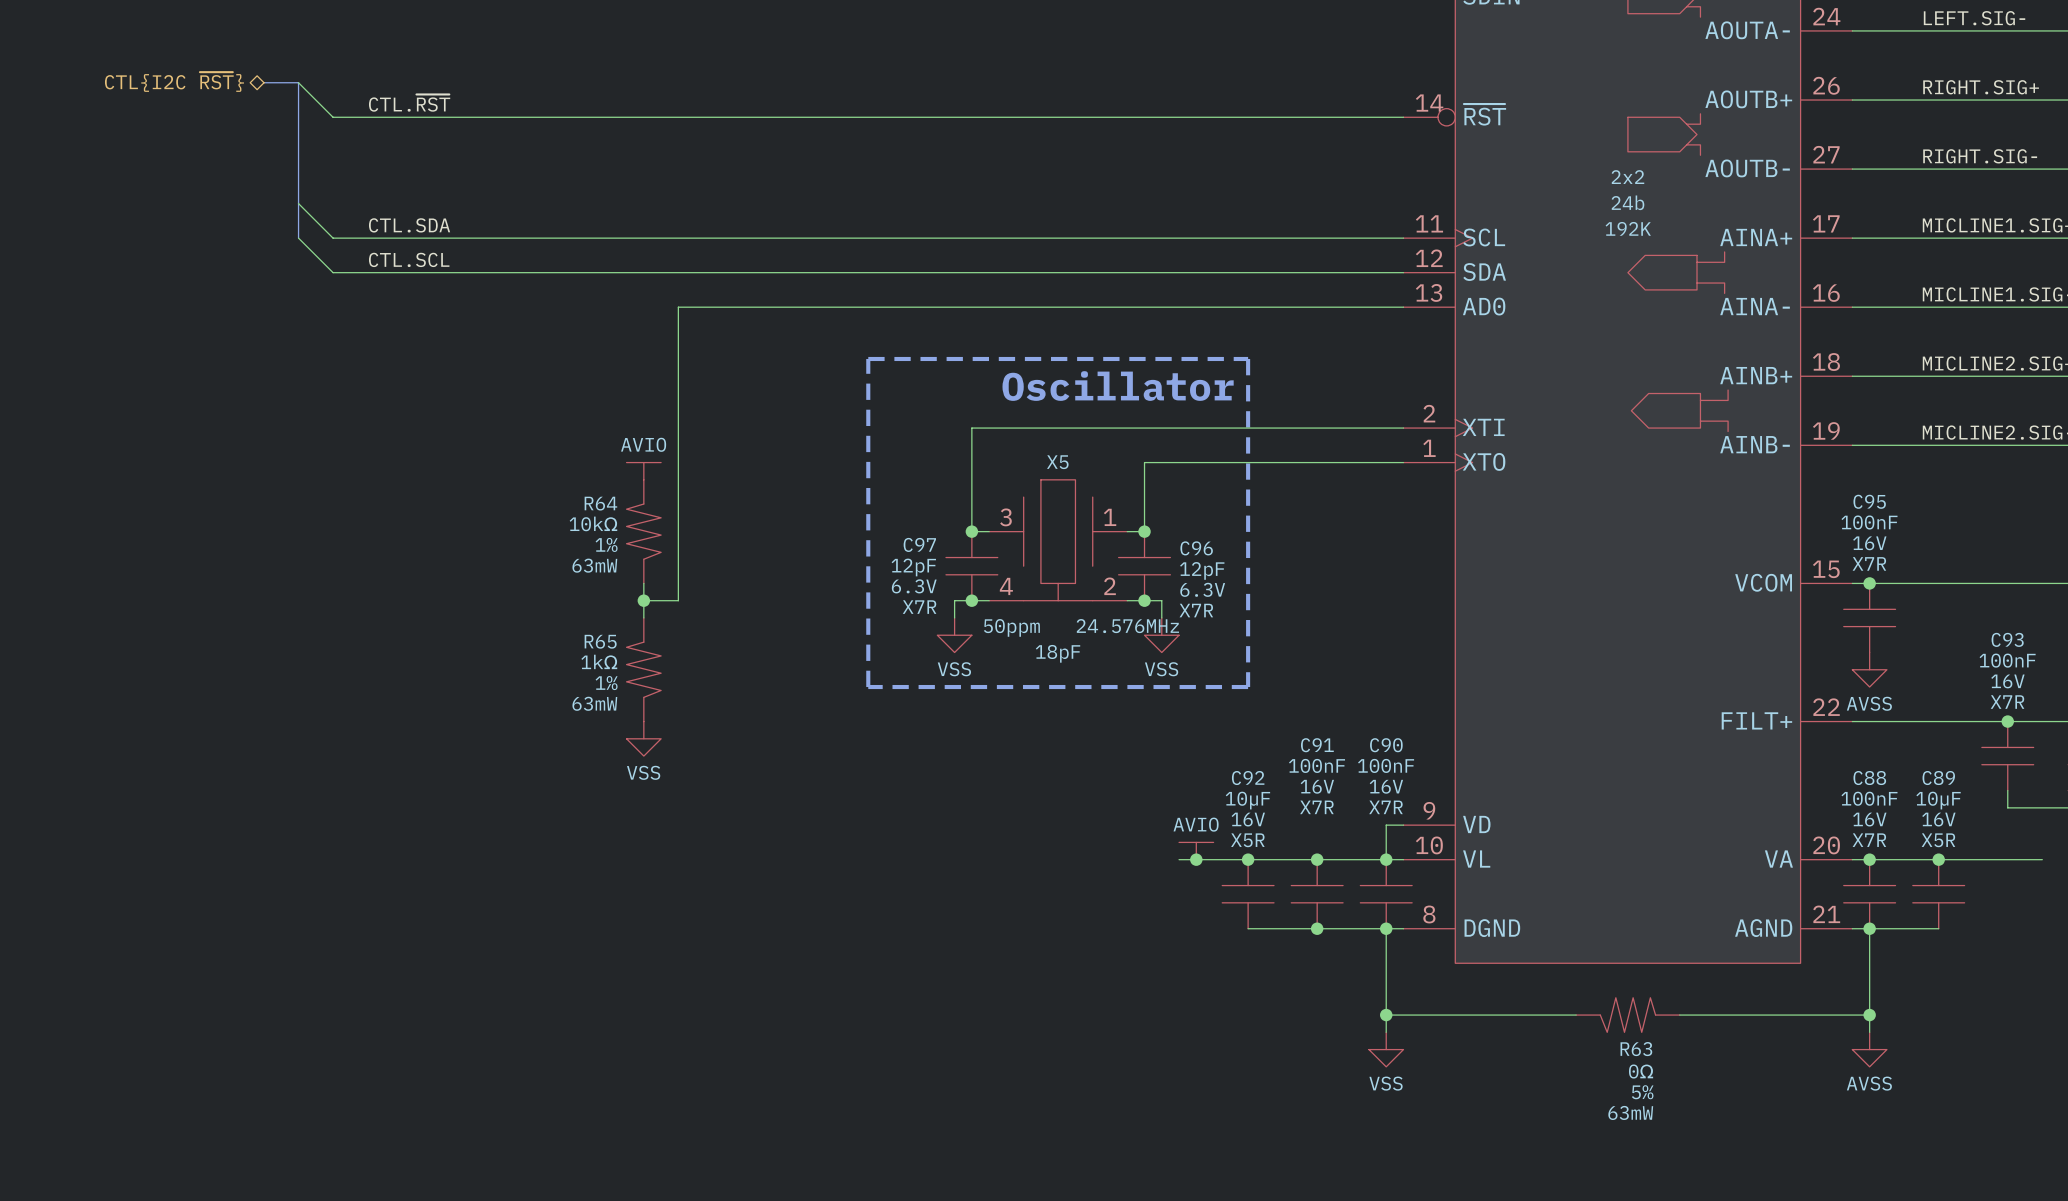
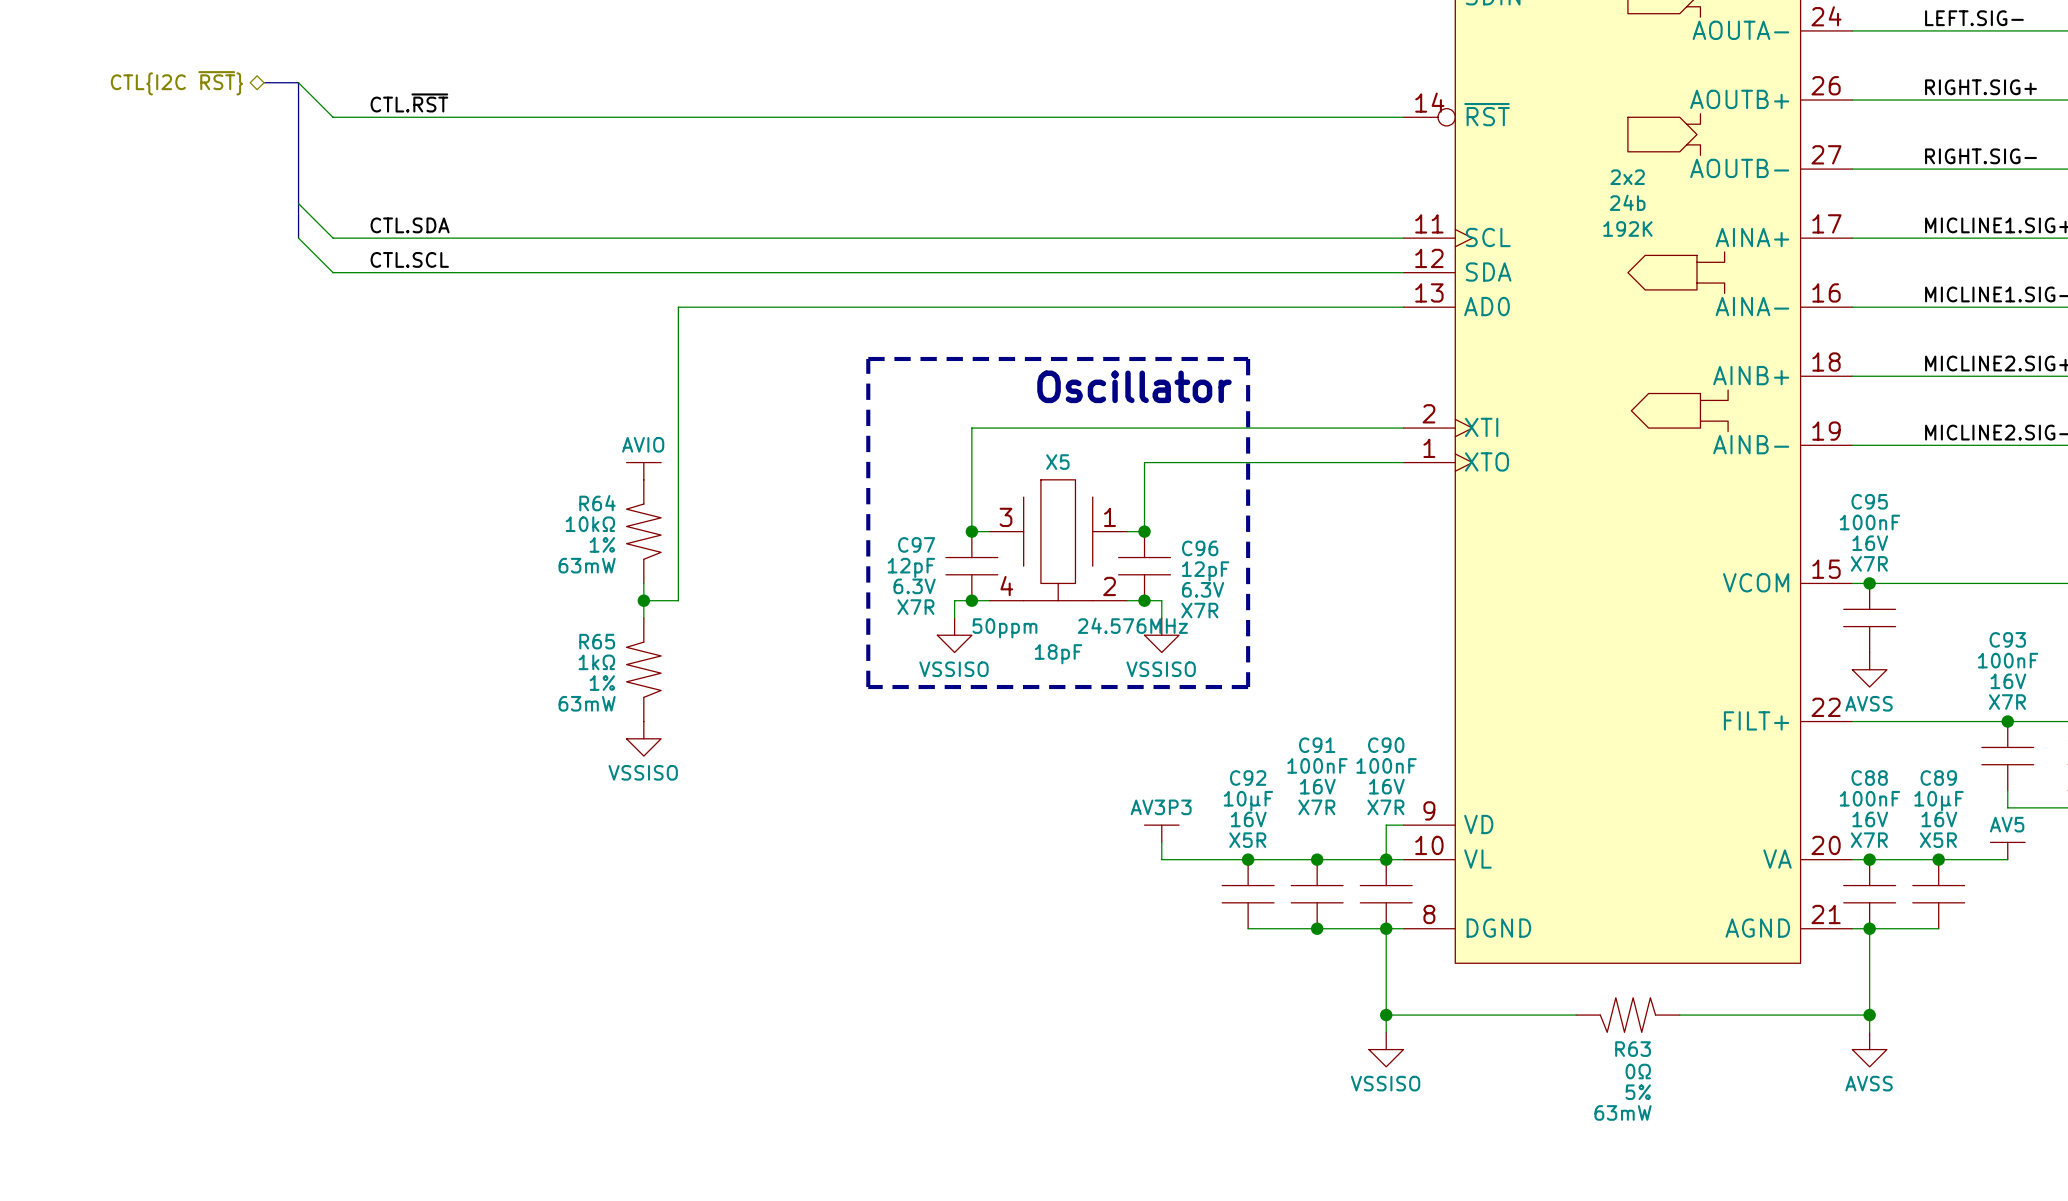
power symbol: VSS (954, 635) -> VSSISO (954, 635)
power symbol: VSS (1161, 635) -> VSSISO (1161, 635)
power symbol: VSS (643, 738) -> VSSISO (643, 738)
power symbol: none -> AV3P3 (1161, 833)
wire: none -> (1161, 842) (1161, 859) (1179, 859)
power symbol: AVIO (1196, 851) -> none
power symbol: none -> AV5 (2007, 851)
junction: (1196, 859) -> none
wire: (2007, 859) (2042, 859) -> none
power symbol: VSS (1386, 1049) -> VSSISO (1386, 1049)

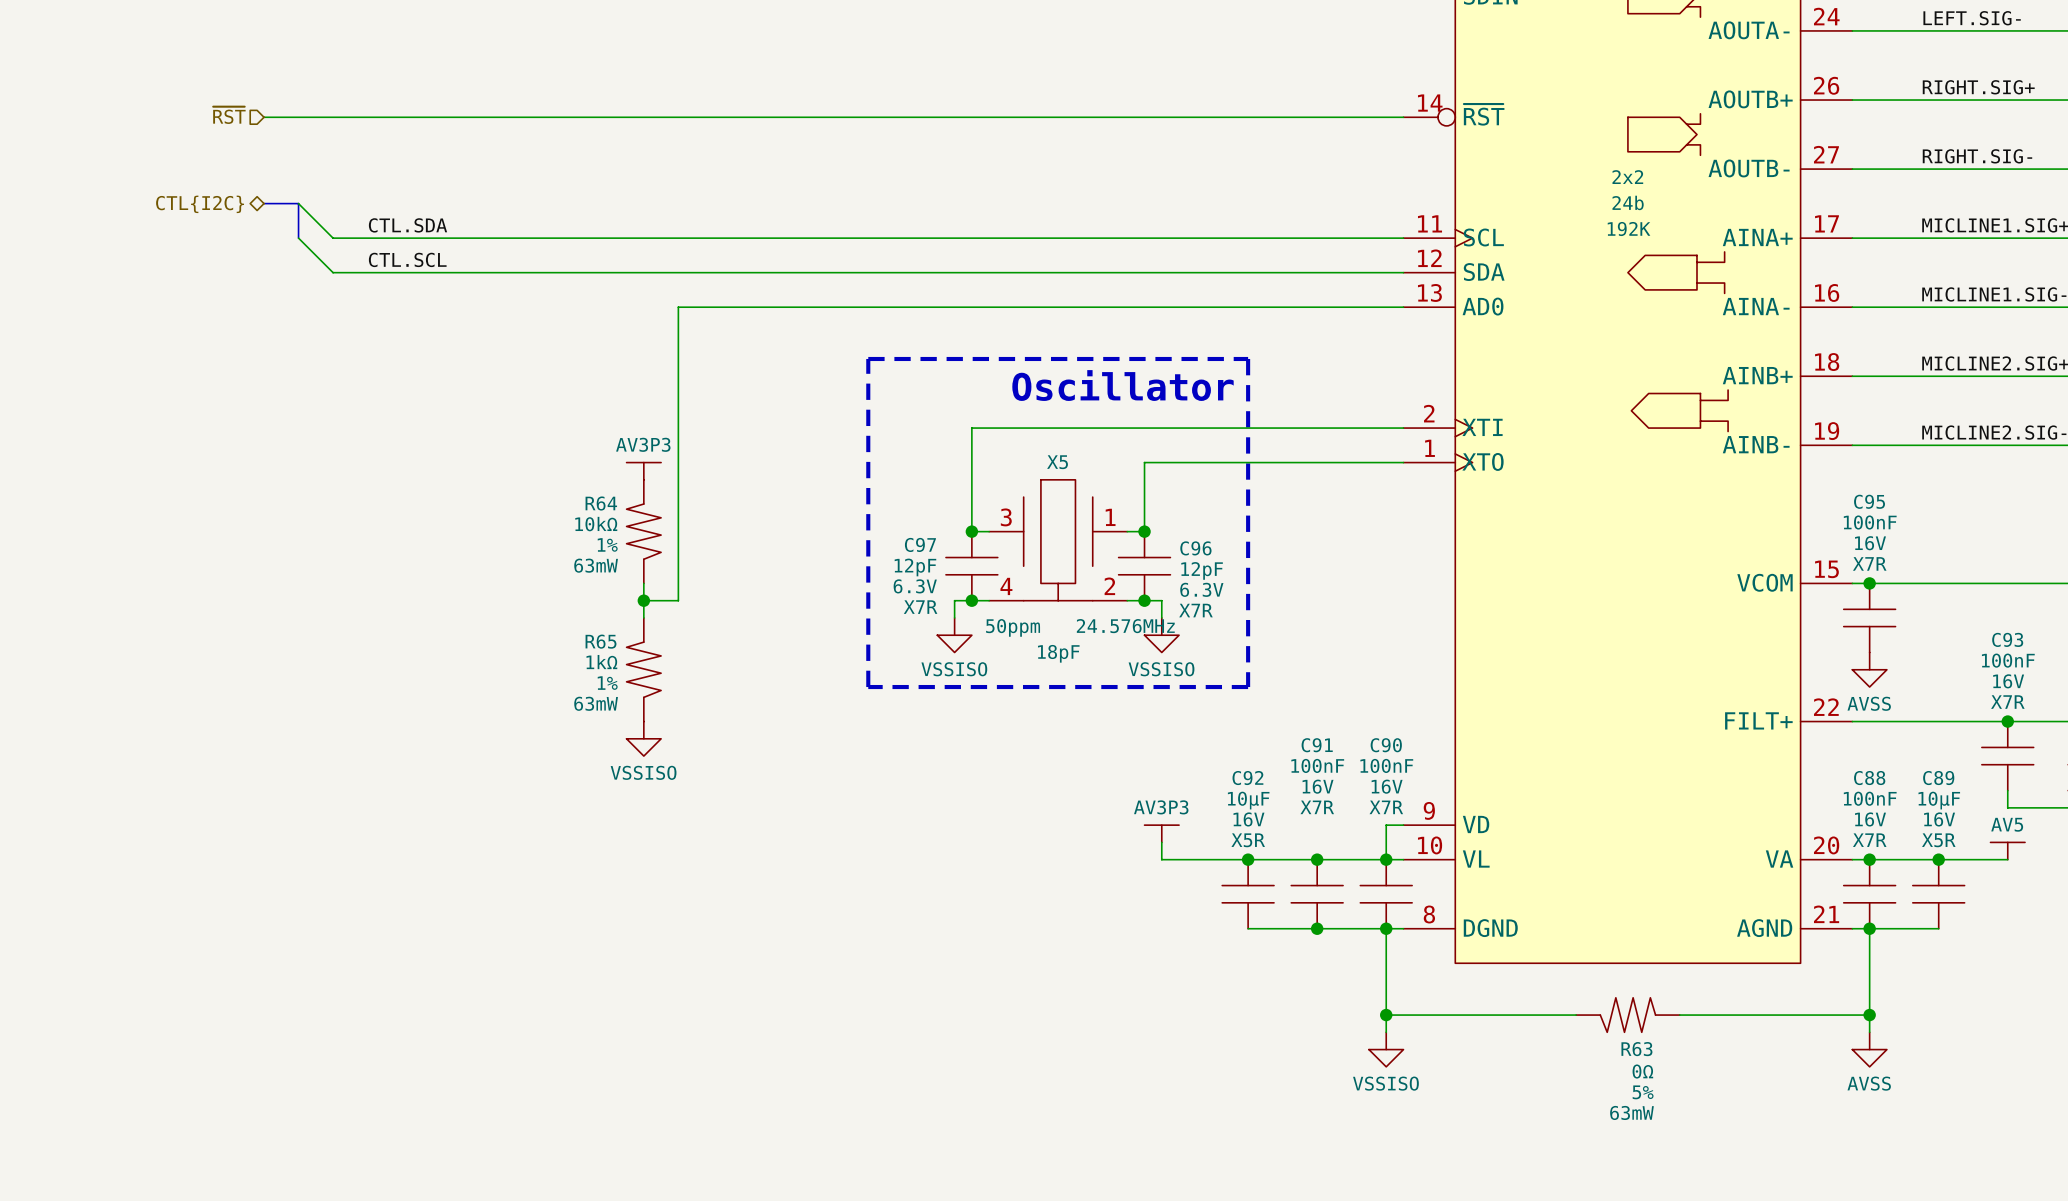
bus: (264, 82) (298, 82) (298, 203) -> (264, 203) (298, 203)
wire: (298, 82) (333, 117) -> (264, 117) (333, 117)
hierarchical label: CTL{I2C ~{RST}} (176, 83) -> none
label: CTL.~{RST} (409, 102) -> none
hierarchical label: none -> ~{RST} (229, 115)
hierarchical label: none -> CTL{I2C} (200, 204)
power symbol: AVIO (643, 471) -> AV3P3 (643, 471)

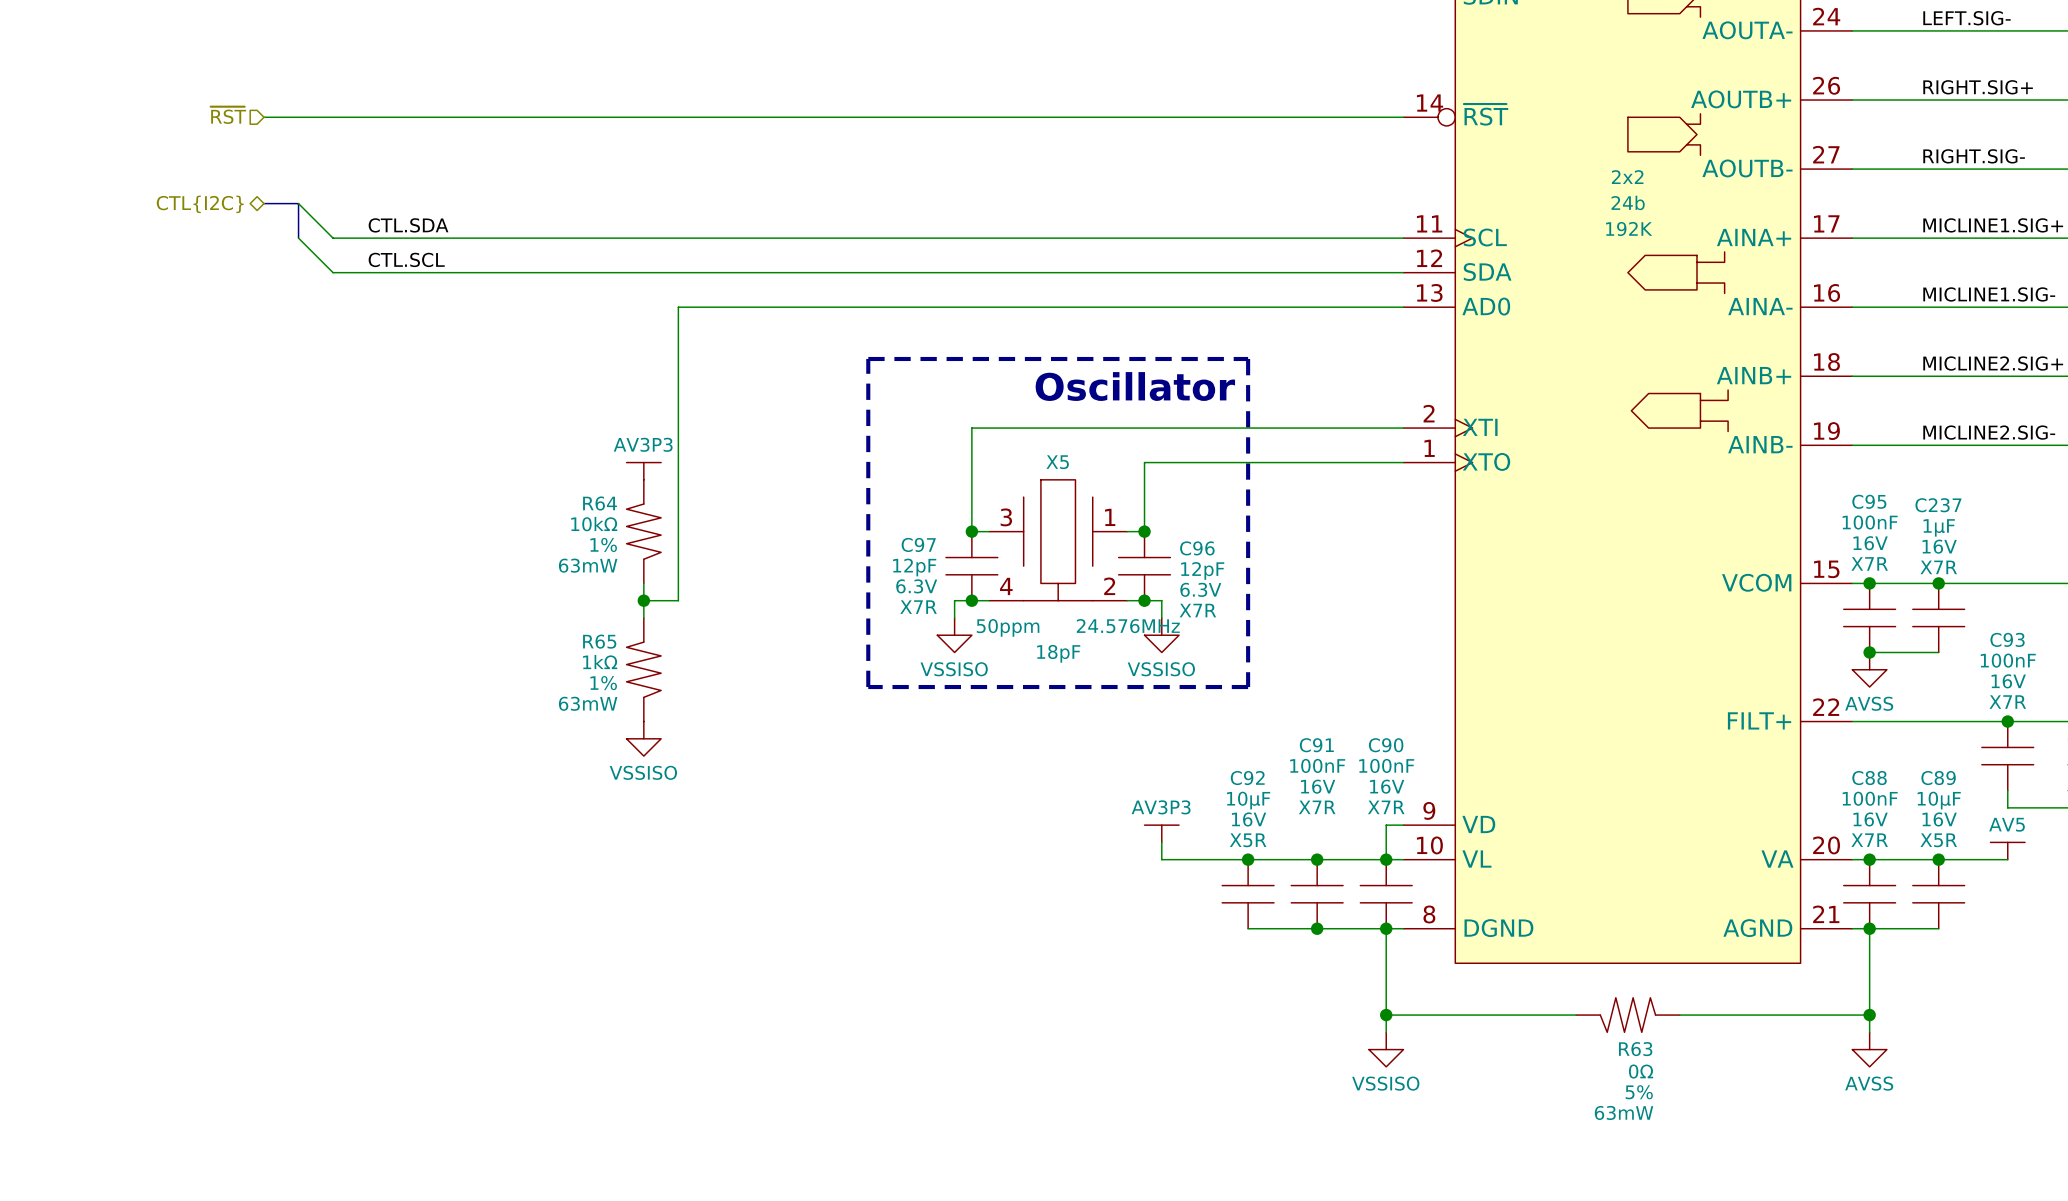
junction: none -> (1938, 583)
C237: none -> (1938, 617)
wire: none -> (1869, 652) (1938, 652)
junction: none -> (1869, 652)

